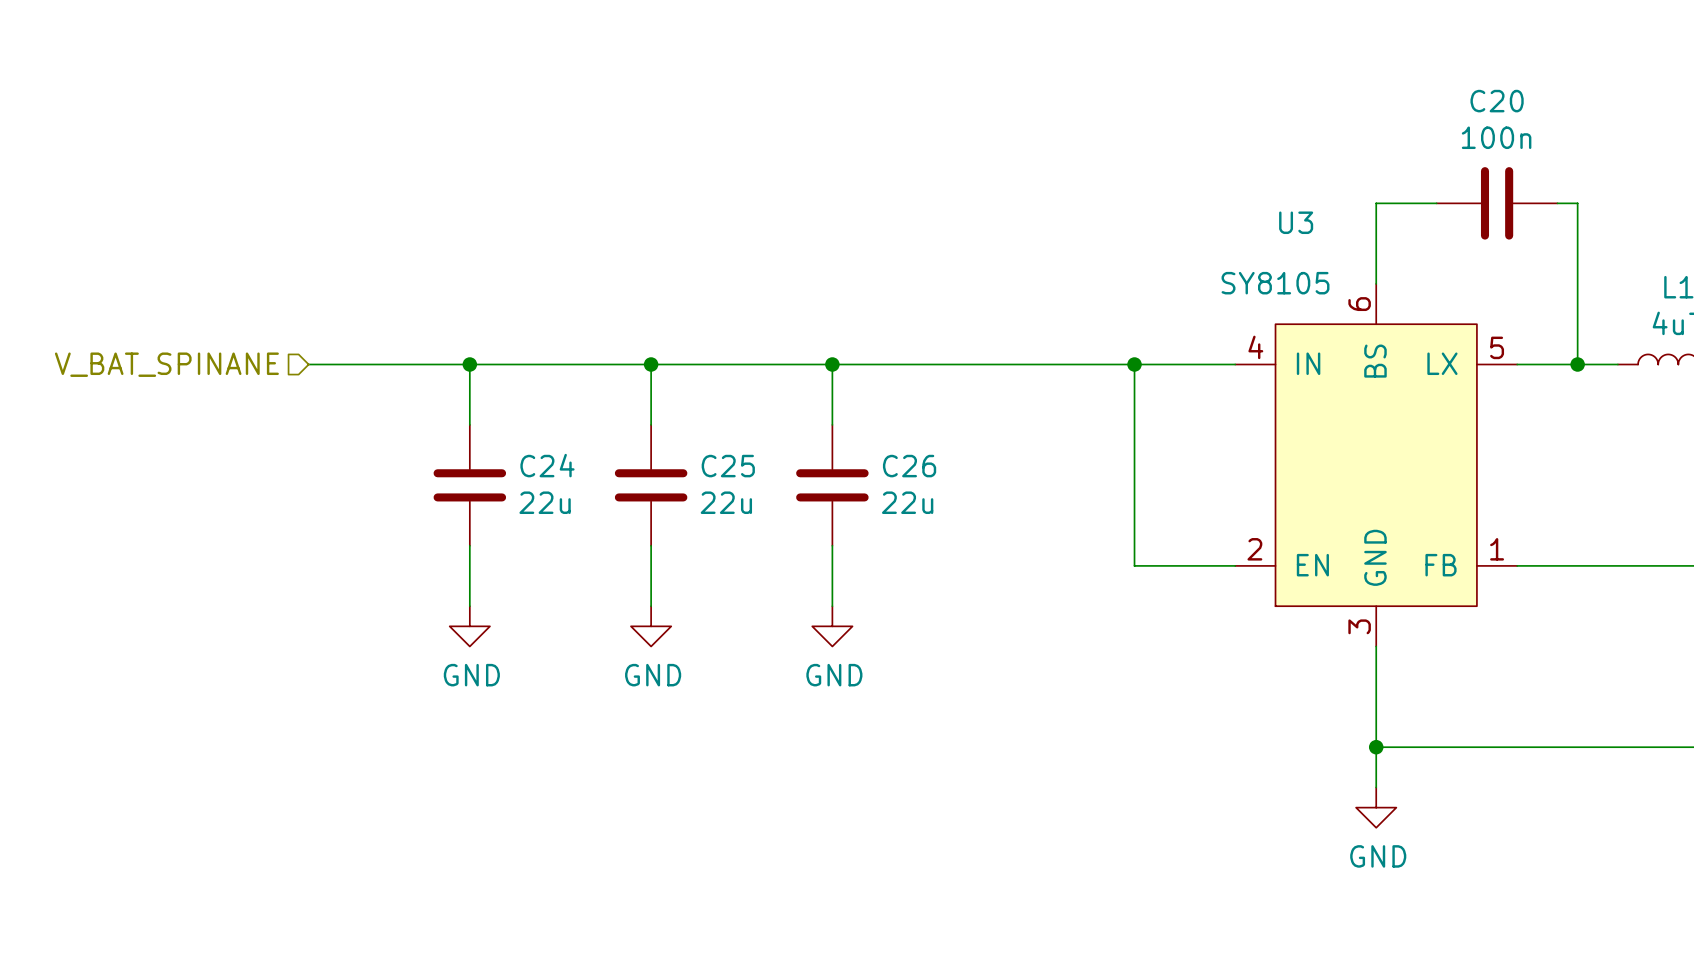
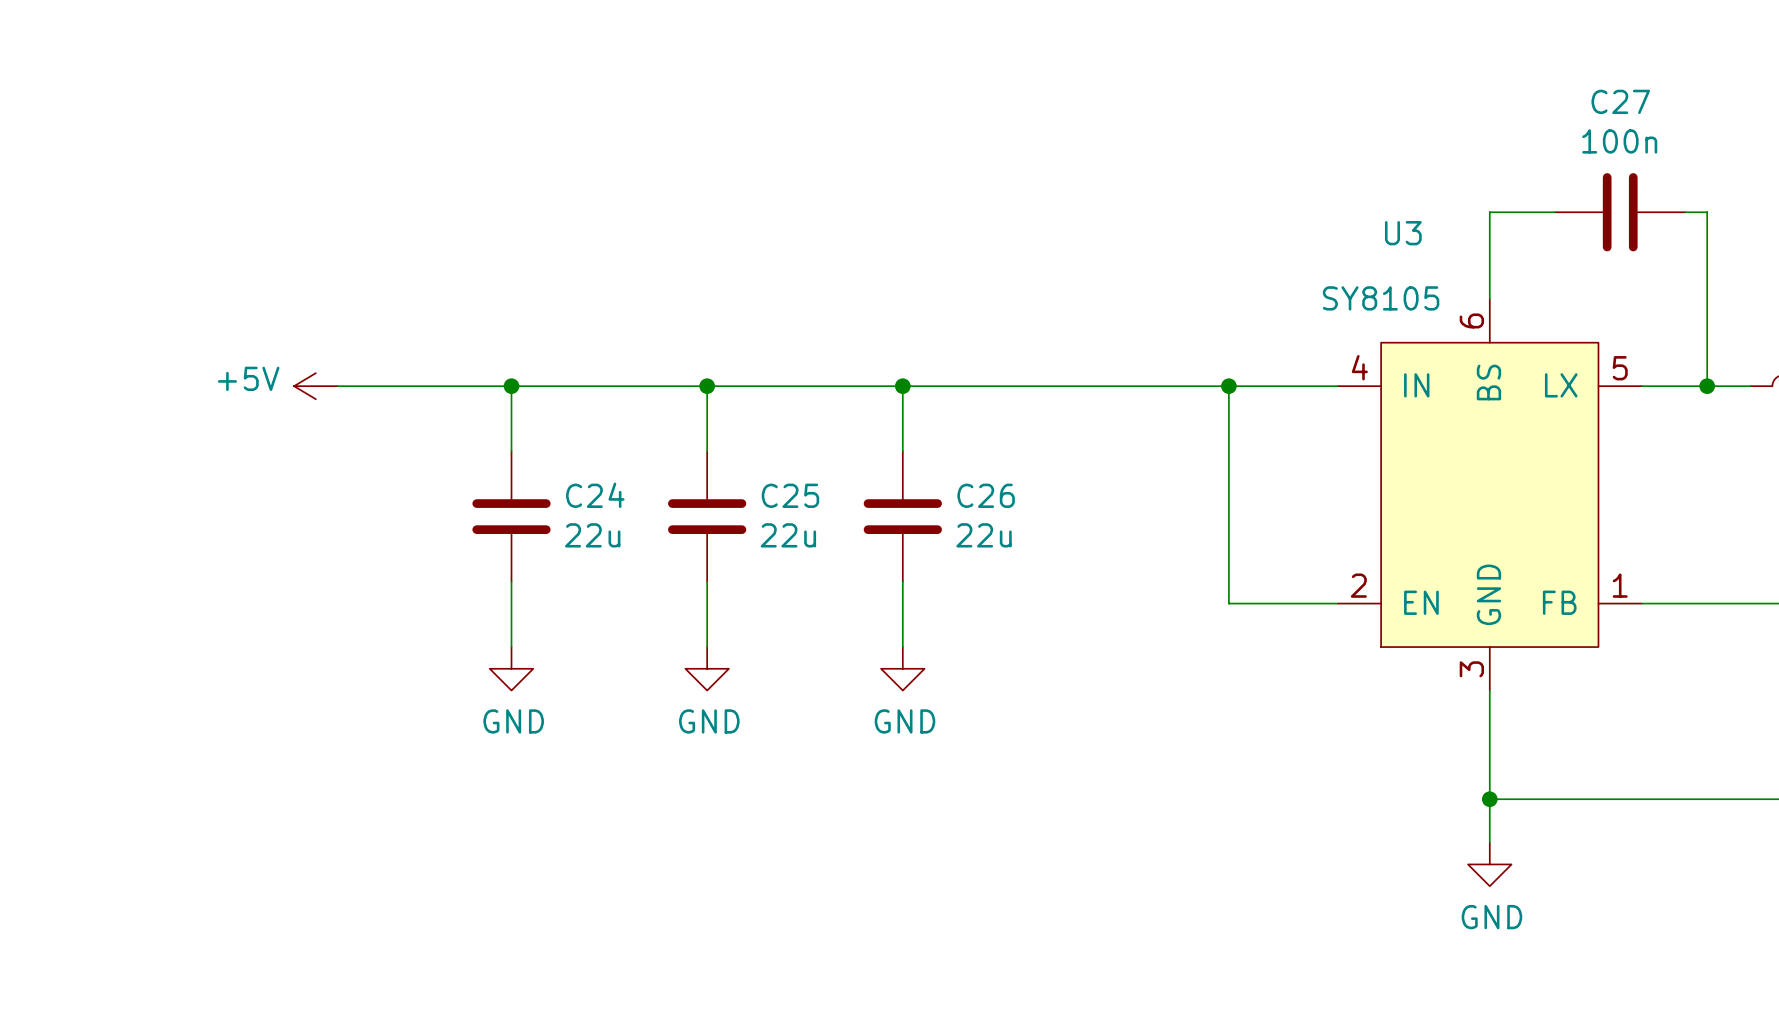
C20 name: C20 (1497, 101) -> C27 (1620, 101)
hierarchical label: V_BAT_SPINANE (166, 364) -> none
power symbol: none -> +5V (315, 386)

